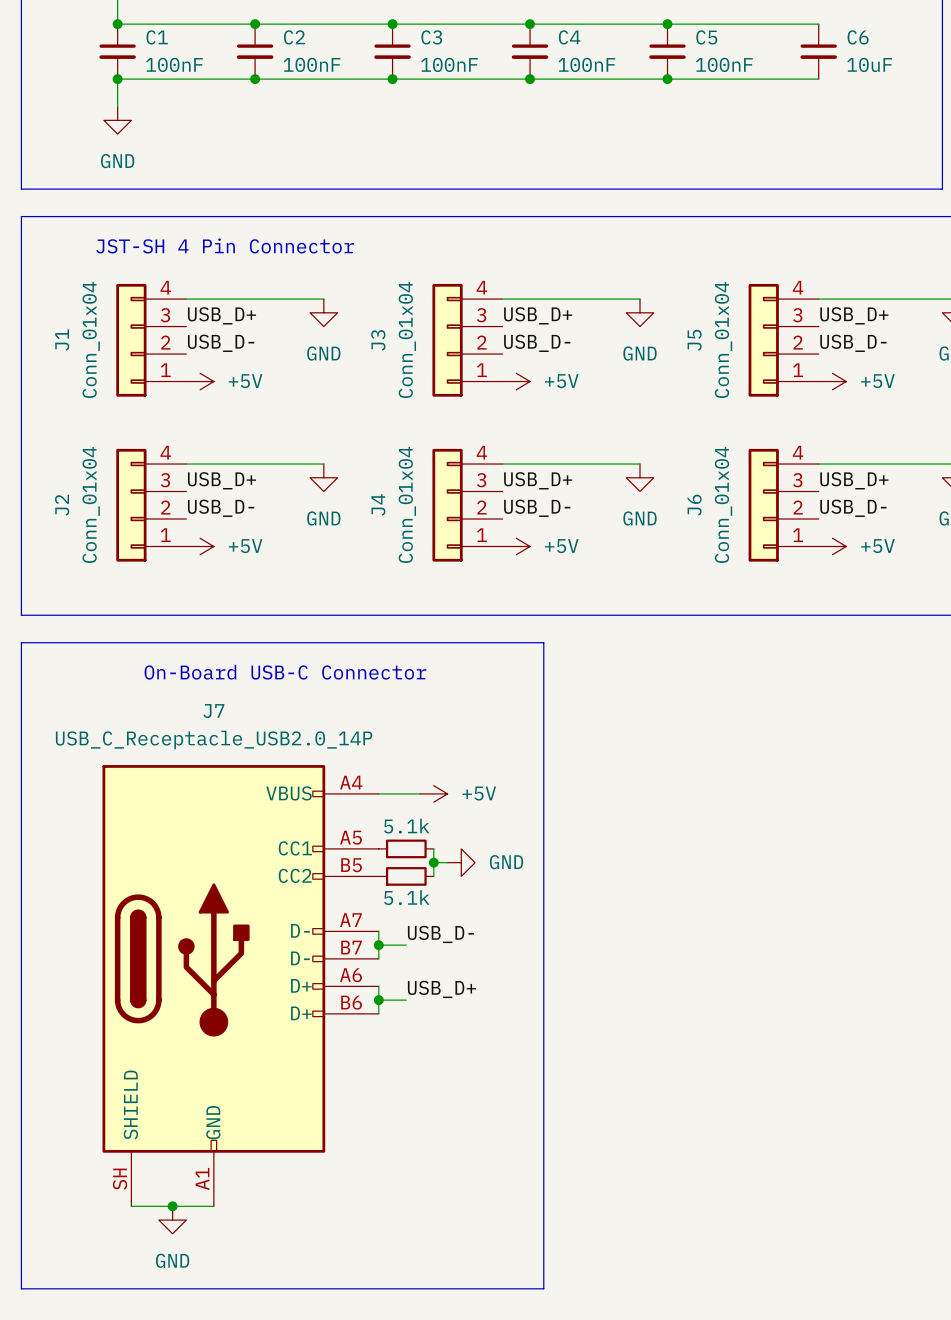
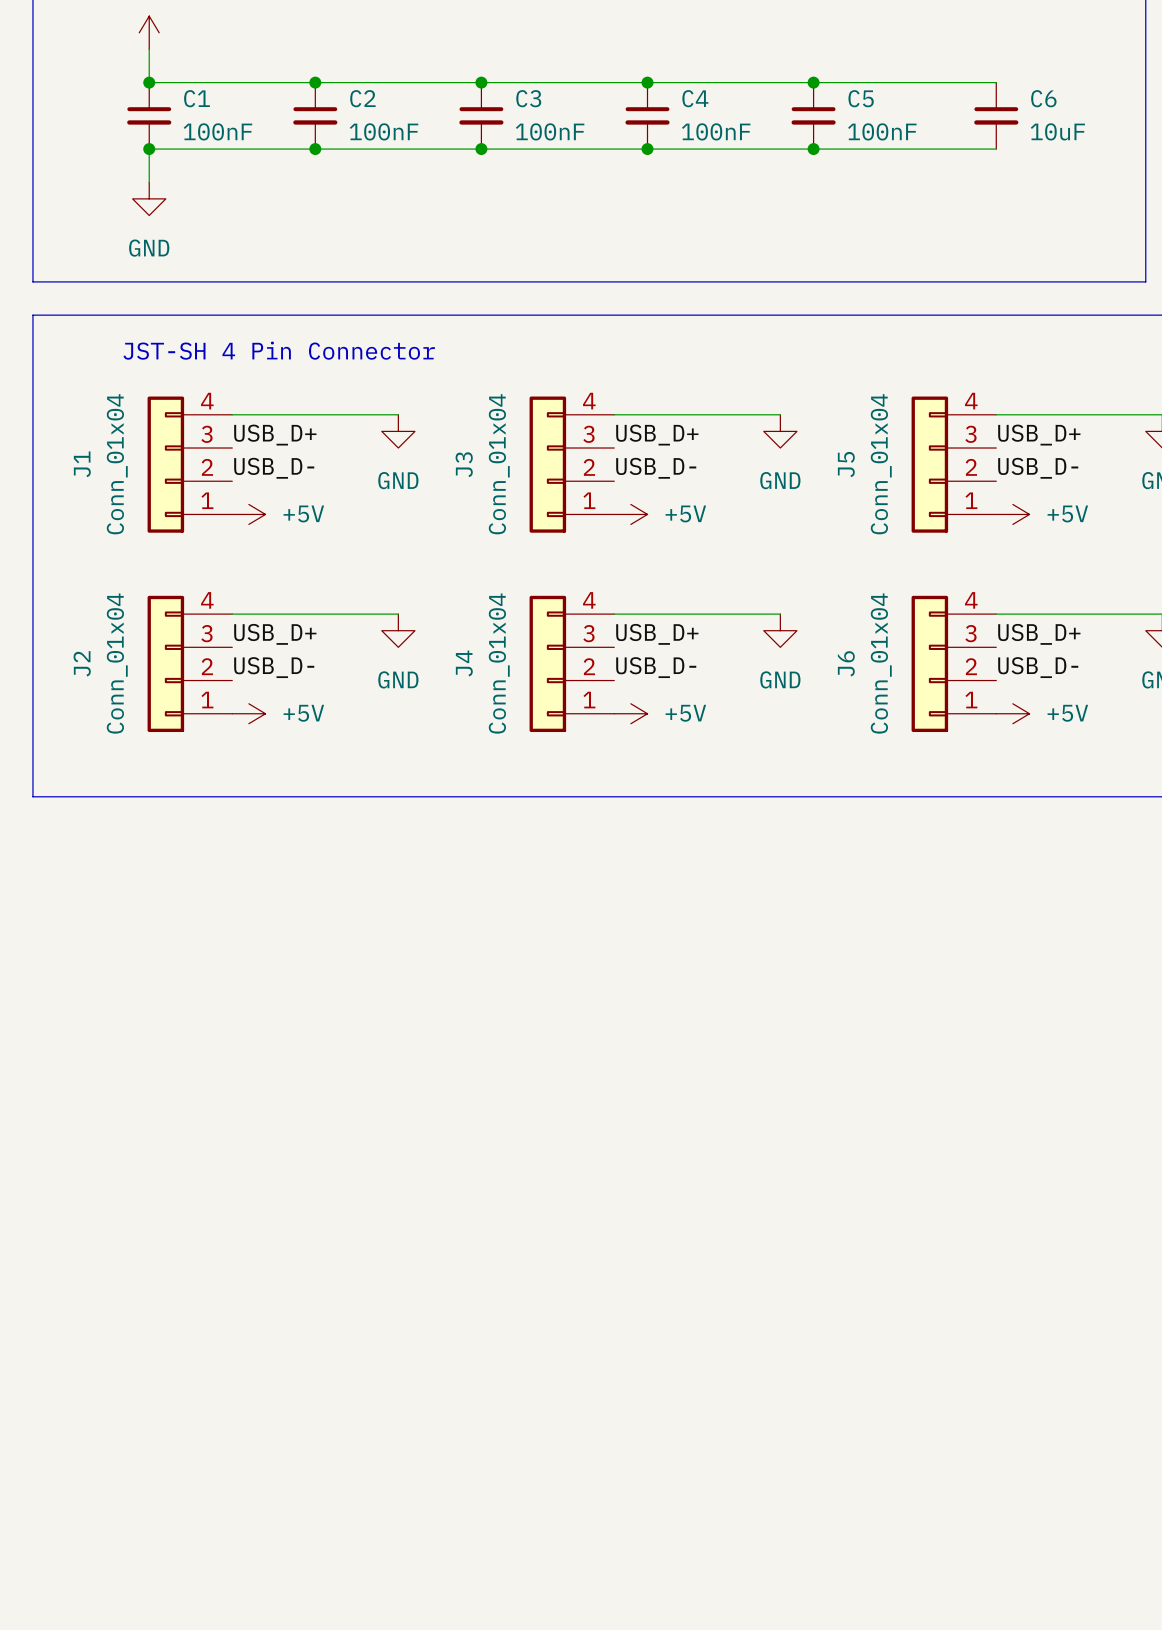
line: (21, 642) (543, 642) (543, 1288) (21, 1288) (21, 642) -> none
text: On-Board USB-C Connector (285, 672) -> none
wire: (378, 793) (420, 793) -> none
power symbol: +5V (433, 793) -> none
part: 5.1k (406, 848) -> none
wire: (433, 848) (433, 876) -> none
wire: (433, 862) (447, 862) -> none
junction: (433, 862) -> none
power symbol: GND (461, 862) -> none
part: 5.1k (406, 876) -> none
wire: (378, 931) (378, 958) -> none
label: USB_D- (441, 934) -> none
wire: (378, 945) (406, 945) -> none
junction: (378, 945) -> none
J7: USB_C_Receptacle_USB2.0_14P (240, 985) -> none
wire: (378, 986) (378, 1013) -> none
label: USB_D+ (441, 989) -> none
wire: (378, 1000) (406, 1000) -> none
junction: (378, 1000) -> none
wire: (131, 1206) (213, 1206) -> none
junction: (172, 1206) -> none
power symbol: GND (172, 1220) -> none

